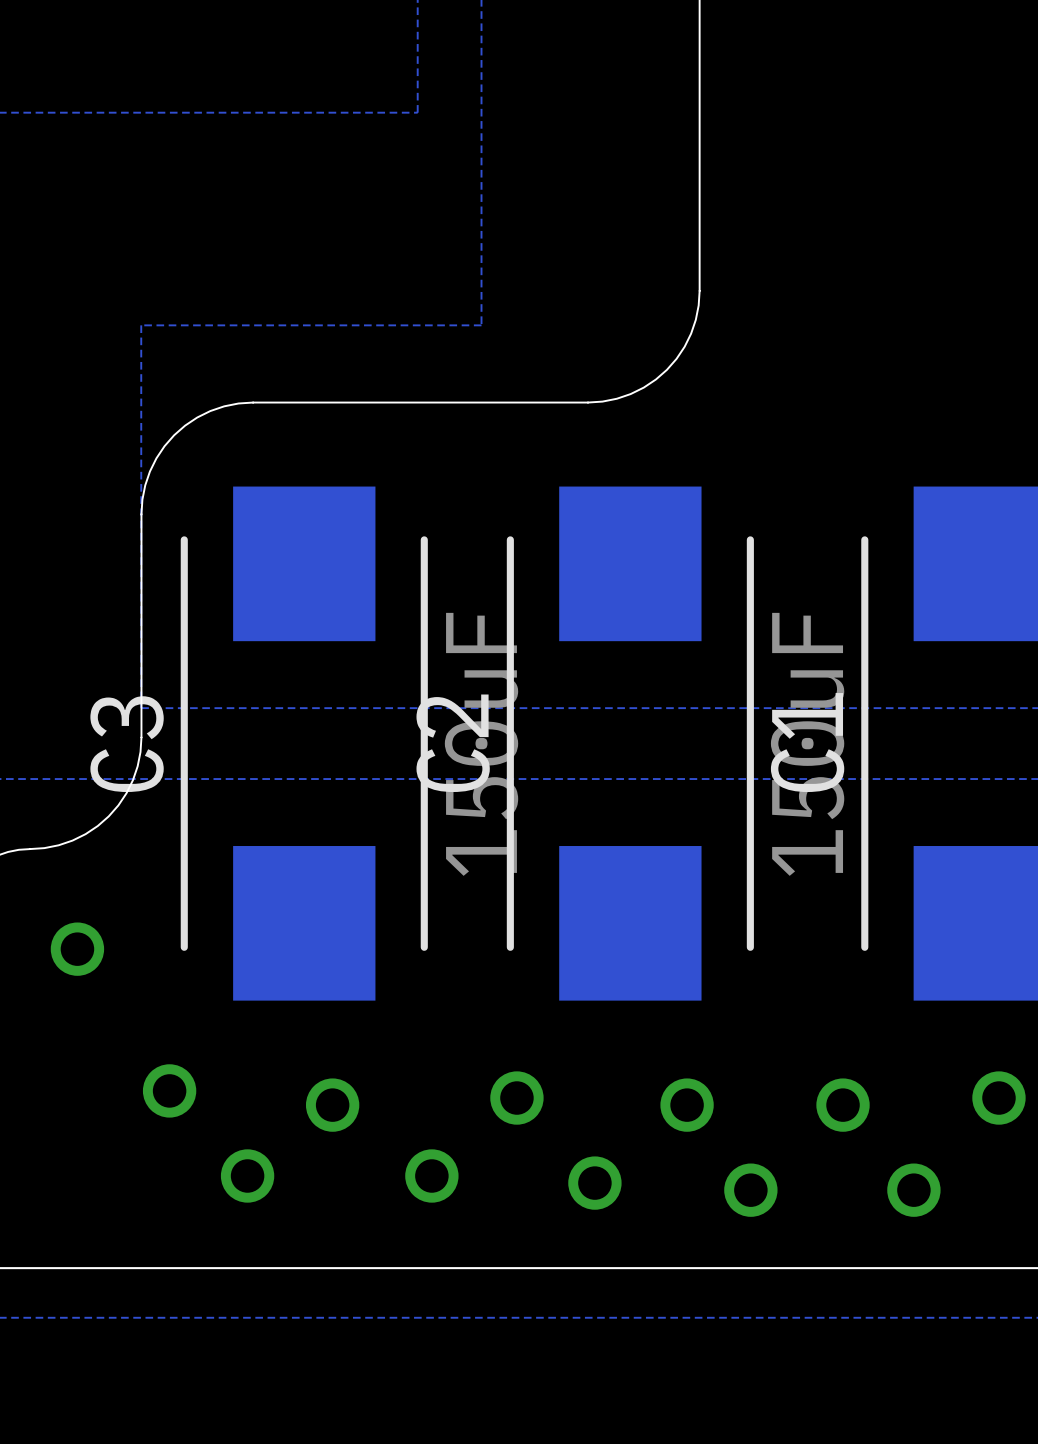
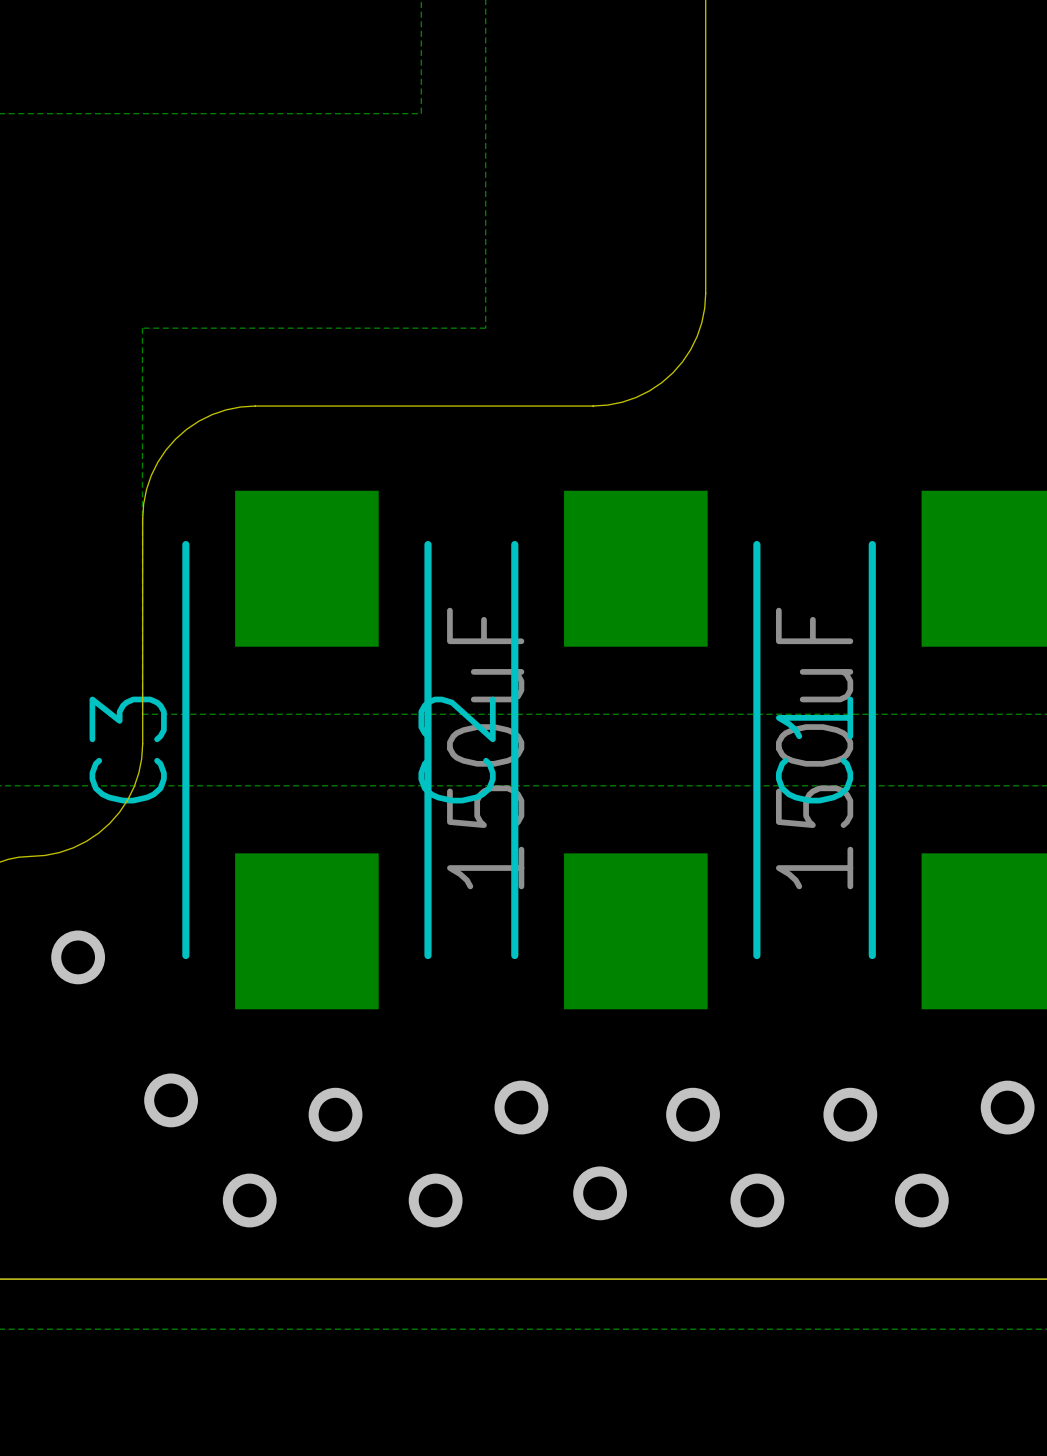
via position: (247, 1175) -> (249, 1200)
via position: (431, 1175) -> (435, 1200)

